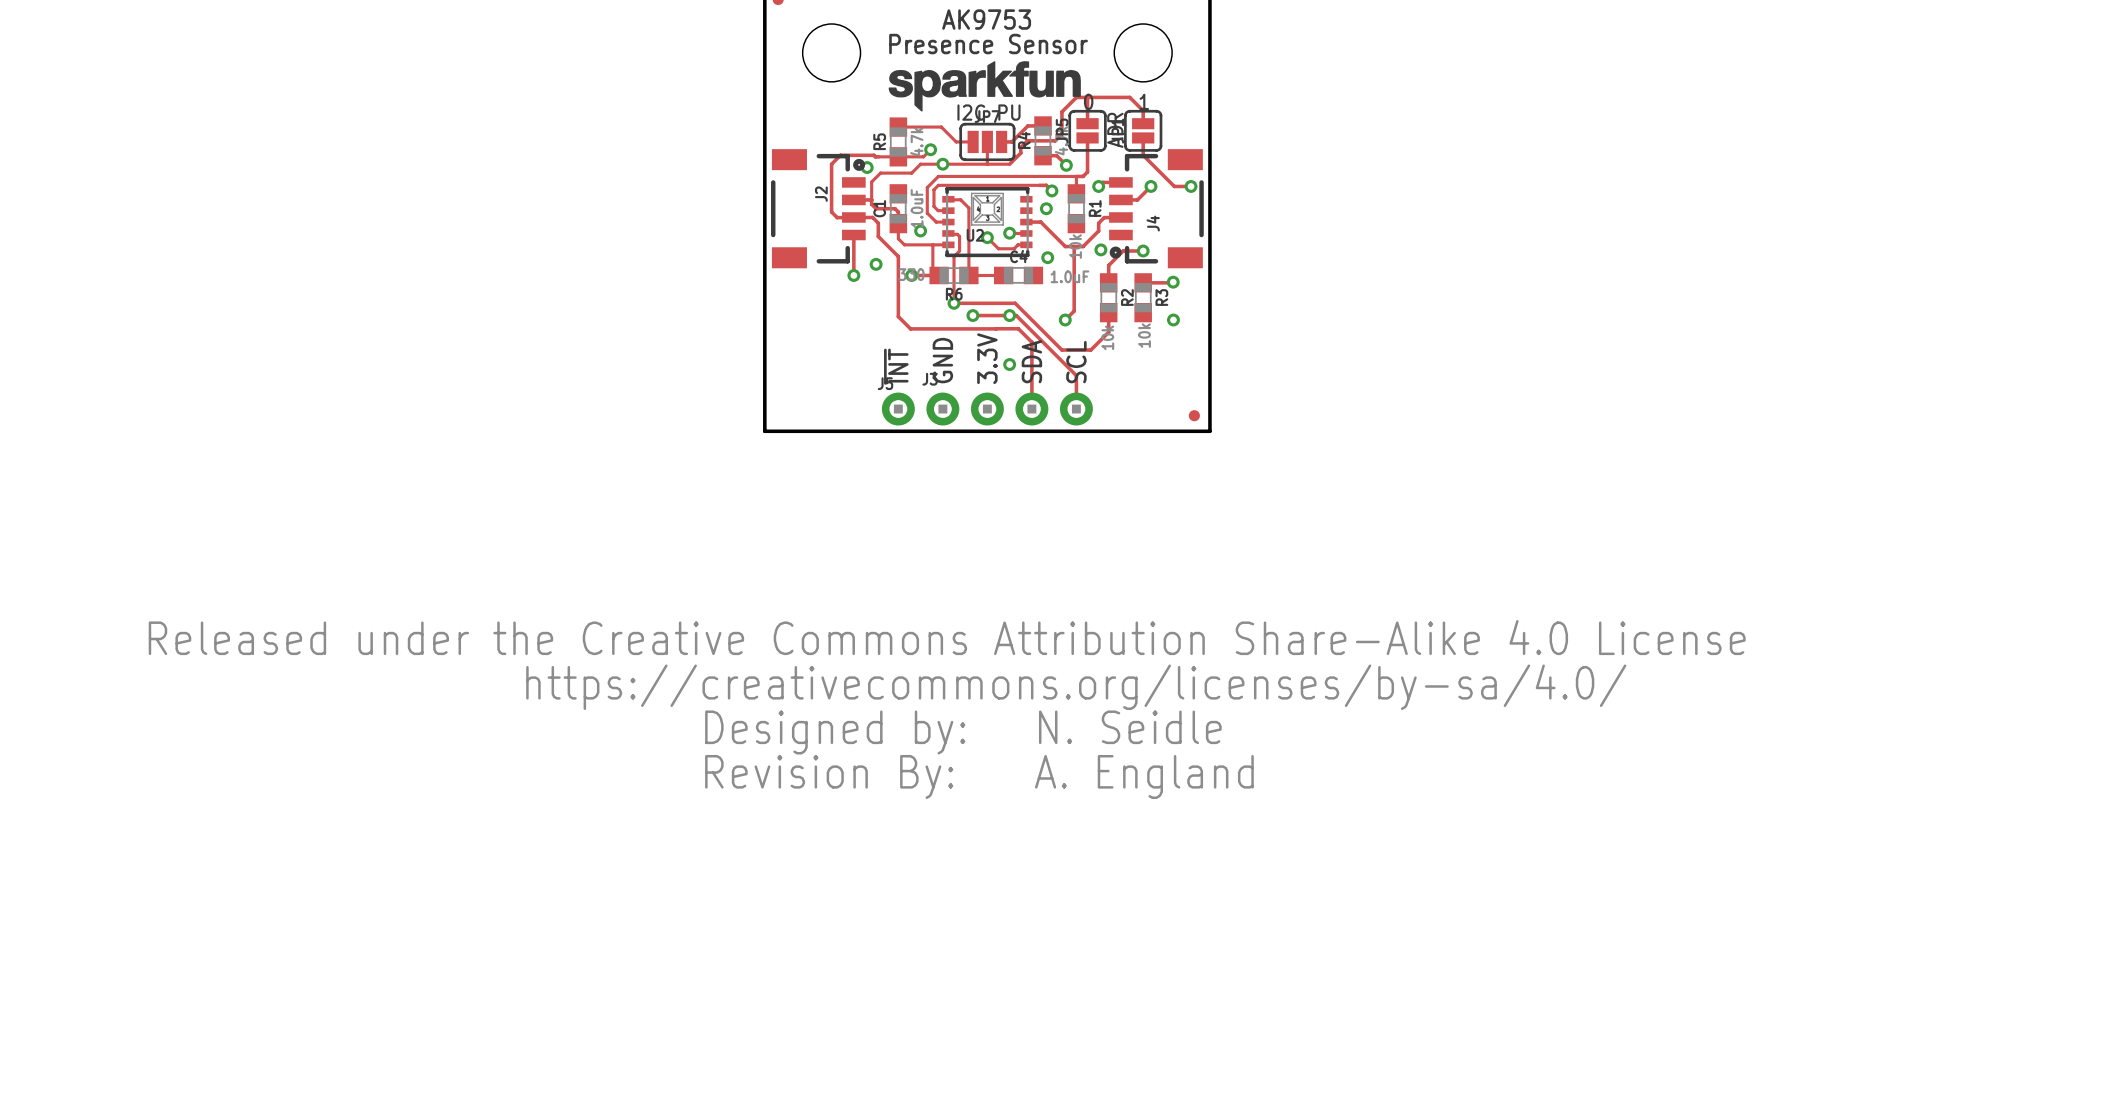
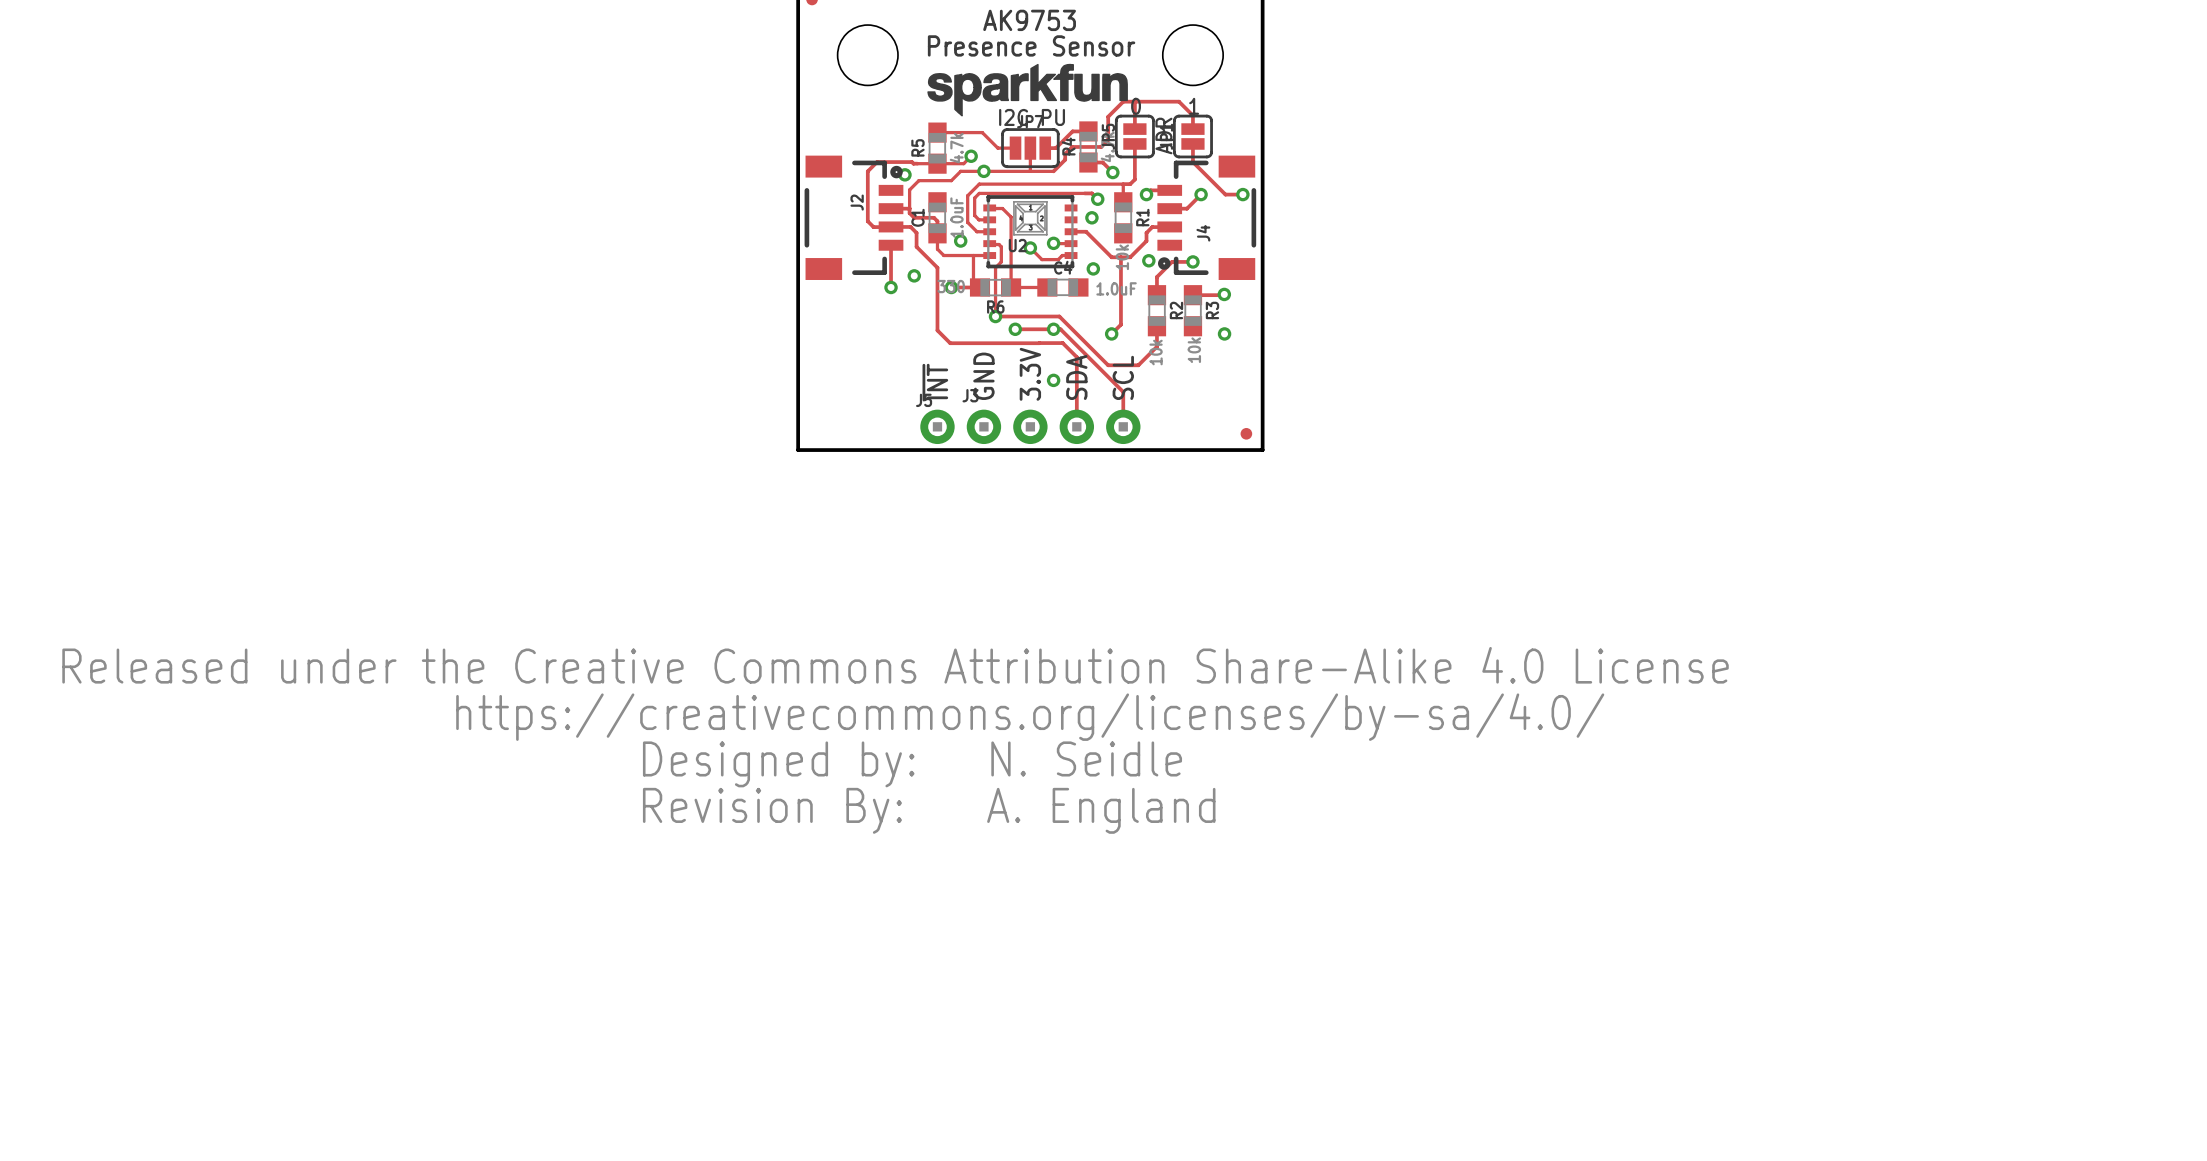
drawing position: (947, 687) -> (895, 717)
text position: N. Seidle (1130, 727) -> N. Seidle (1086, 758)
drawing position: (829, 777) -> (772, 810)
text position: A. England (1144, 777) -> A. England (1101, 810)

